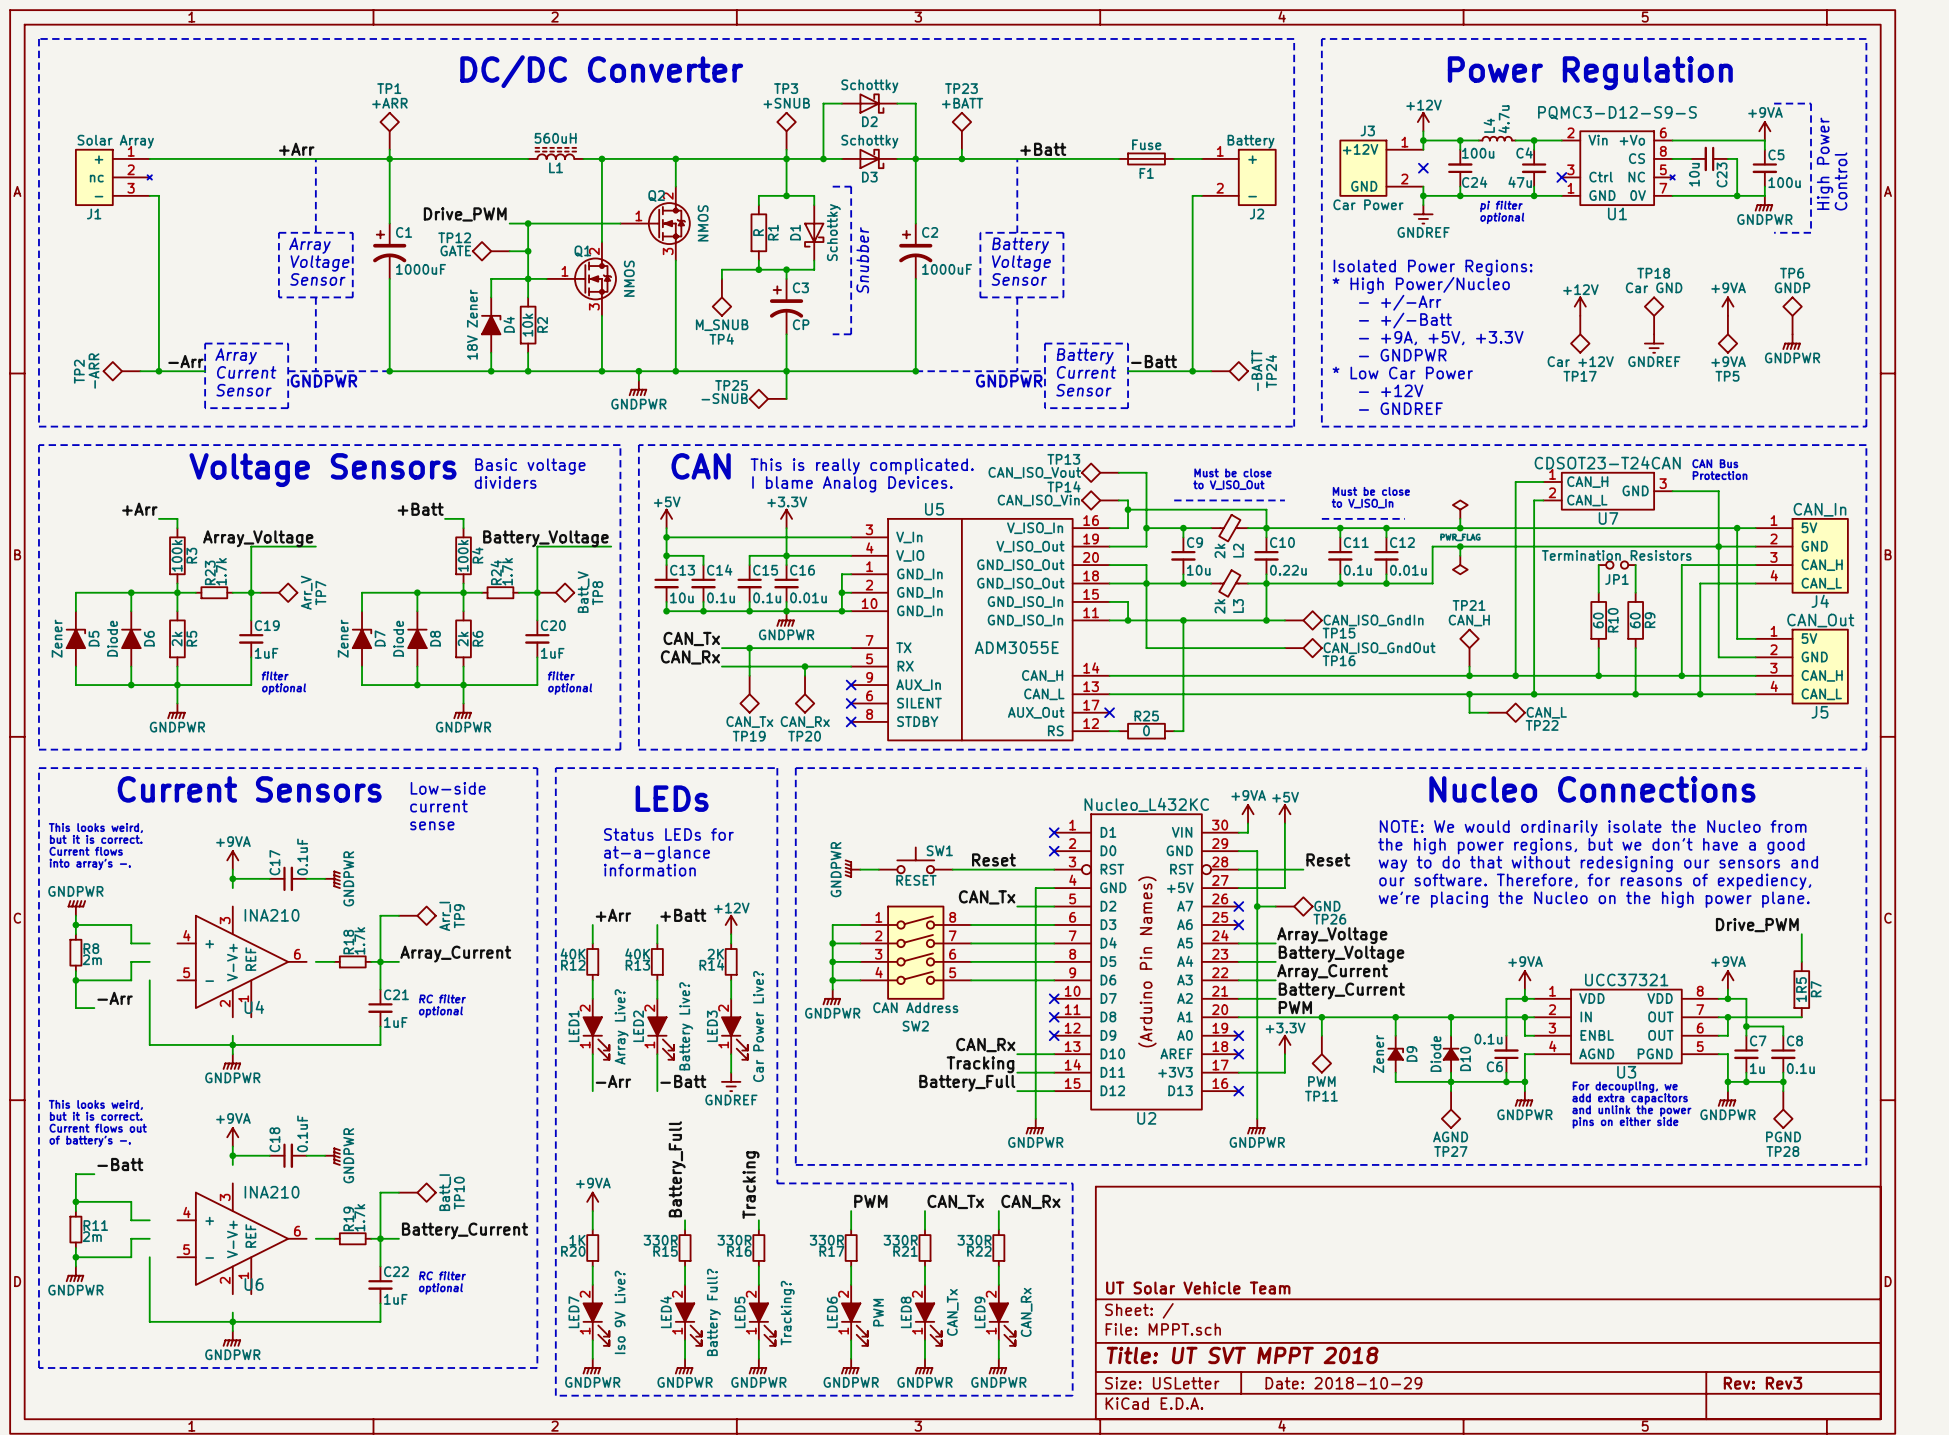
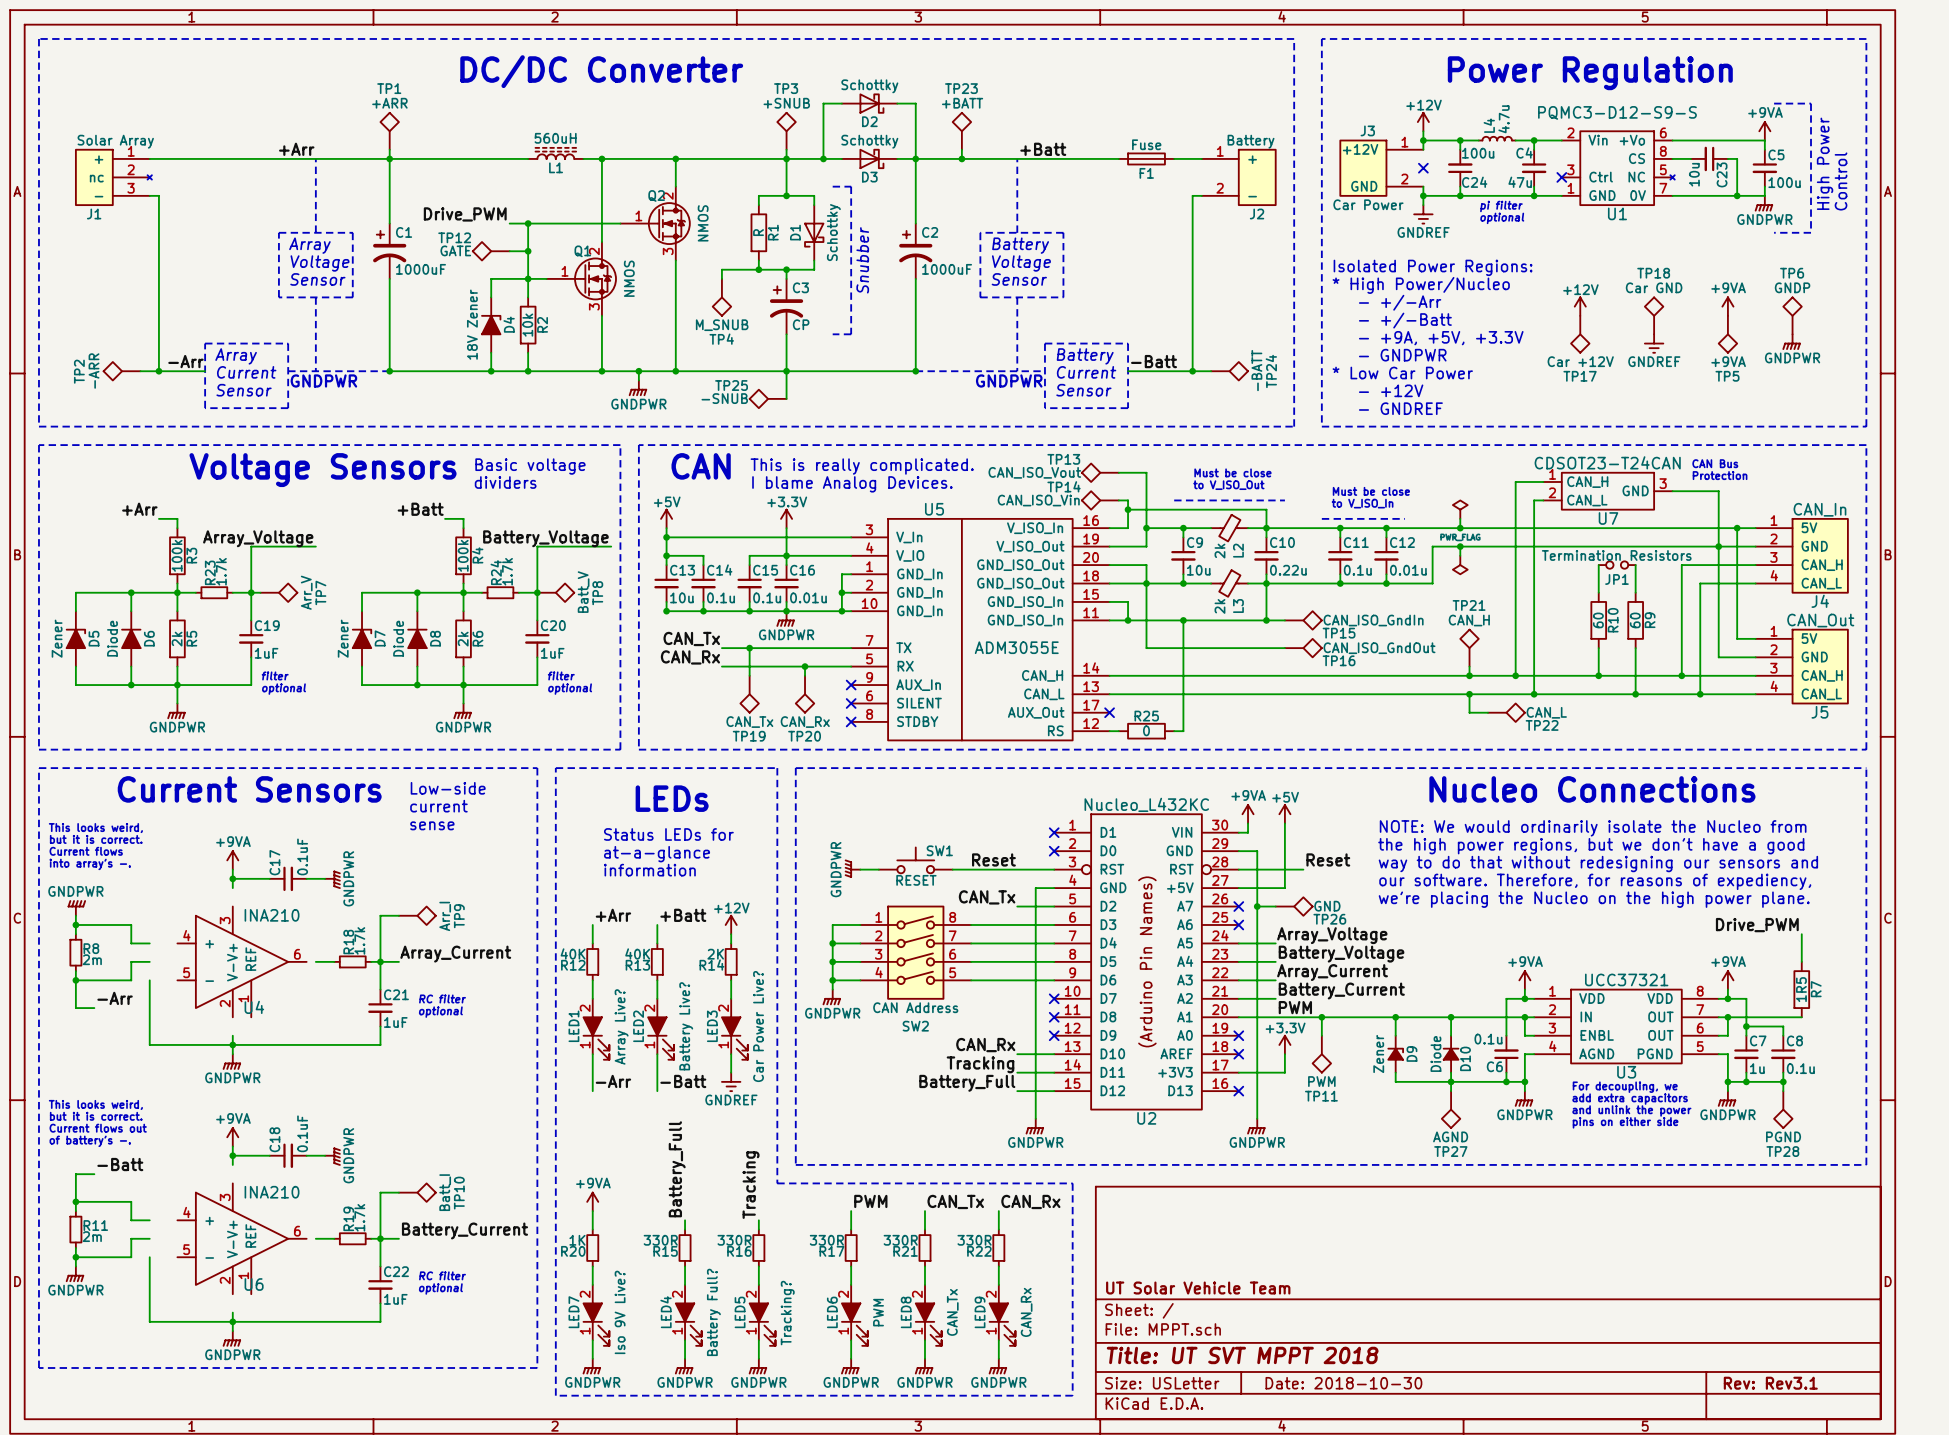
title block: Date: 2018-10-29 (1343, 1383) -> Date: 2018-10-30 (1343, 1383)
title block: Rev: Rev3 (1763, 1383) -> Rev: Rev3.1 (1770, 1383)

